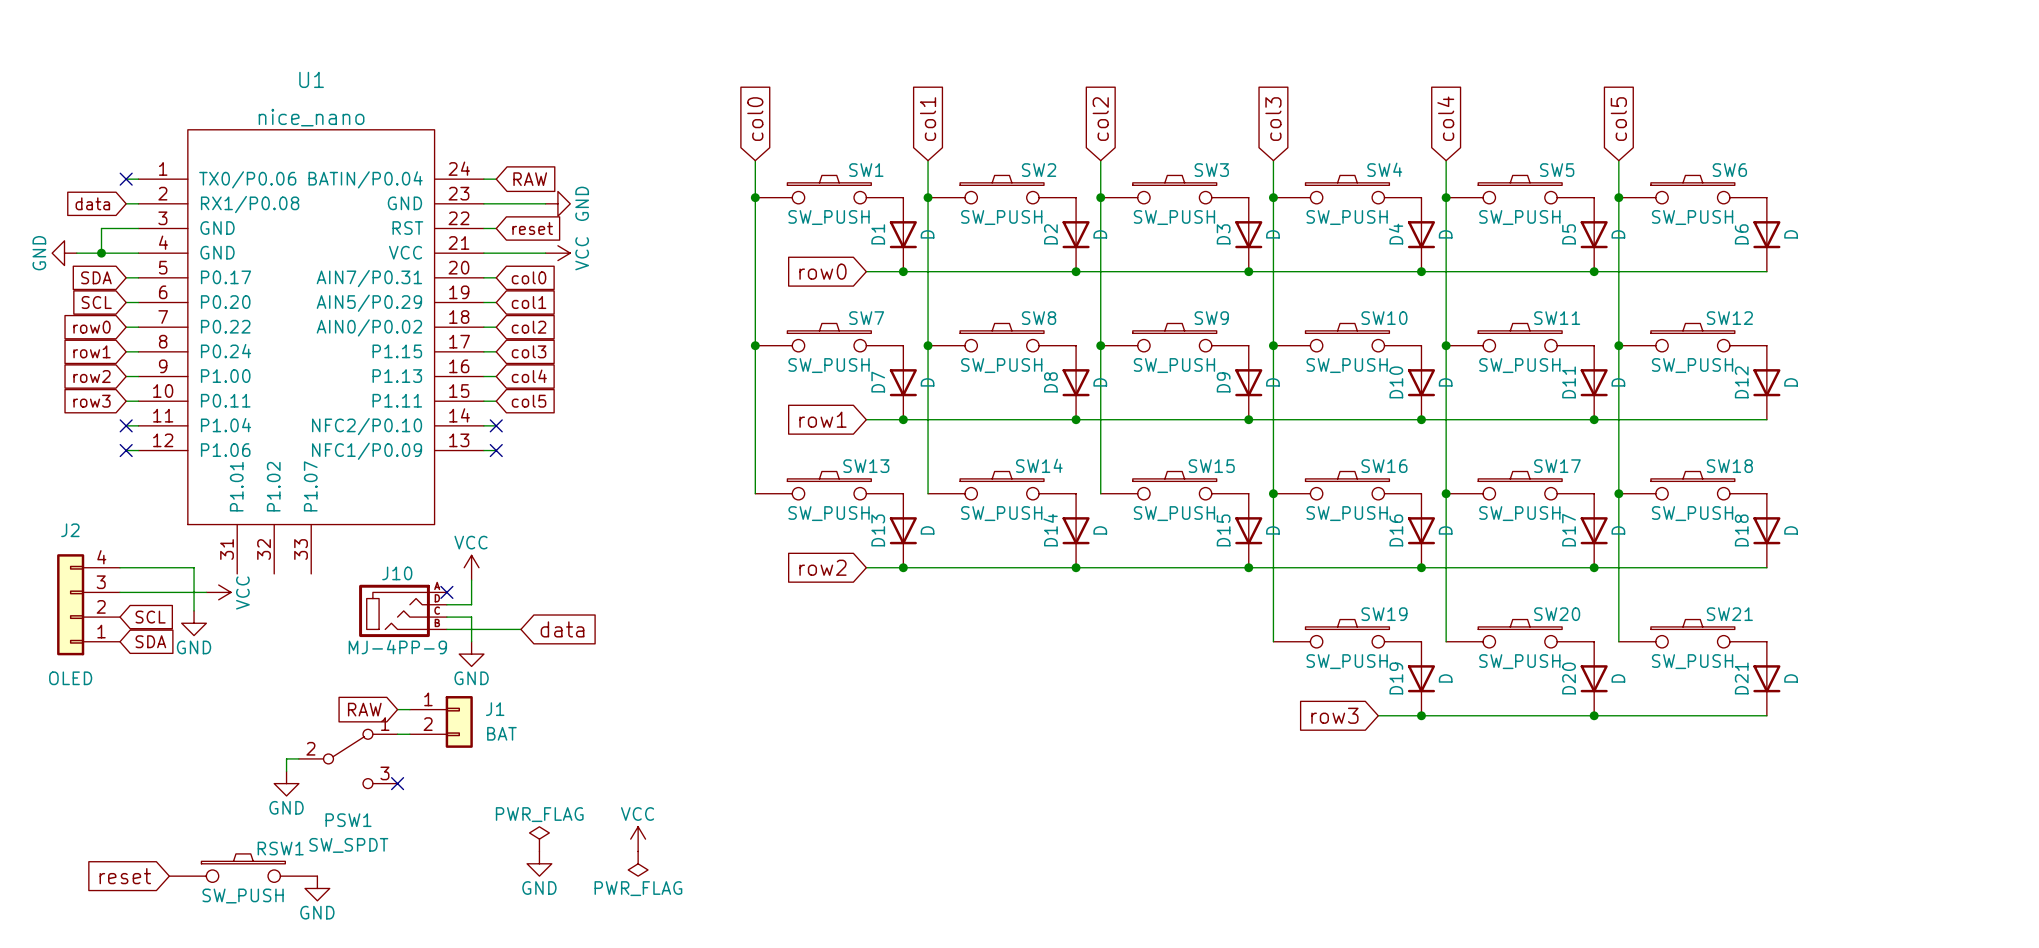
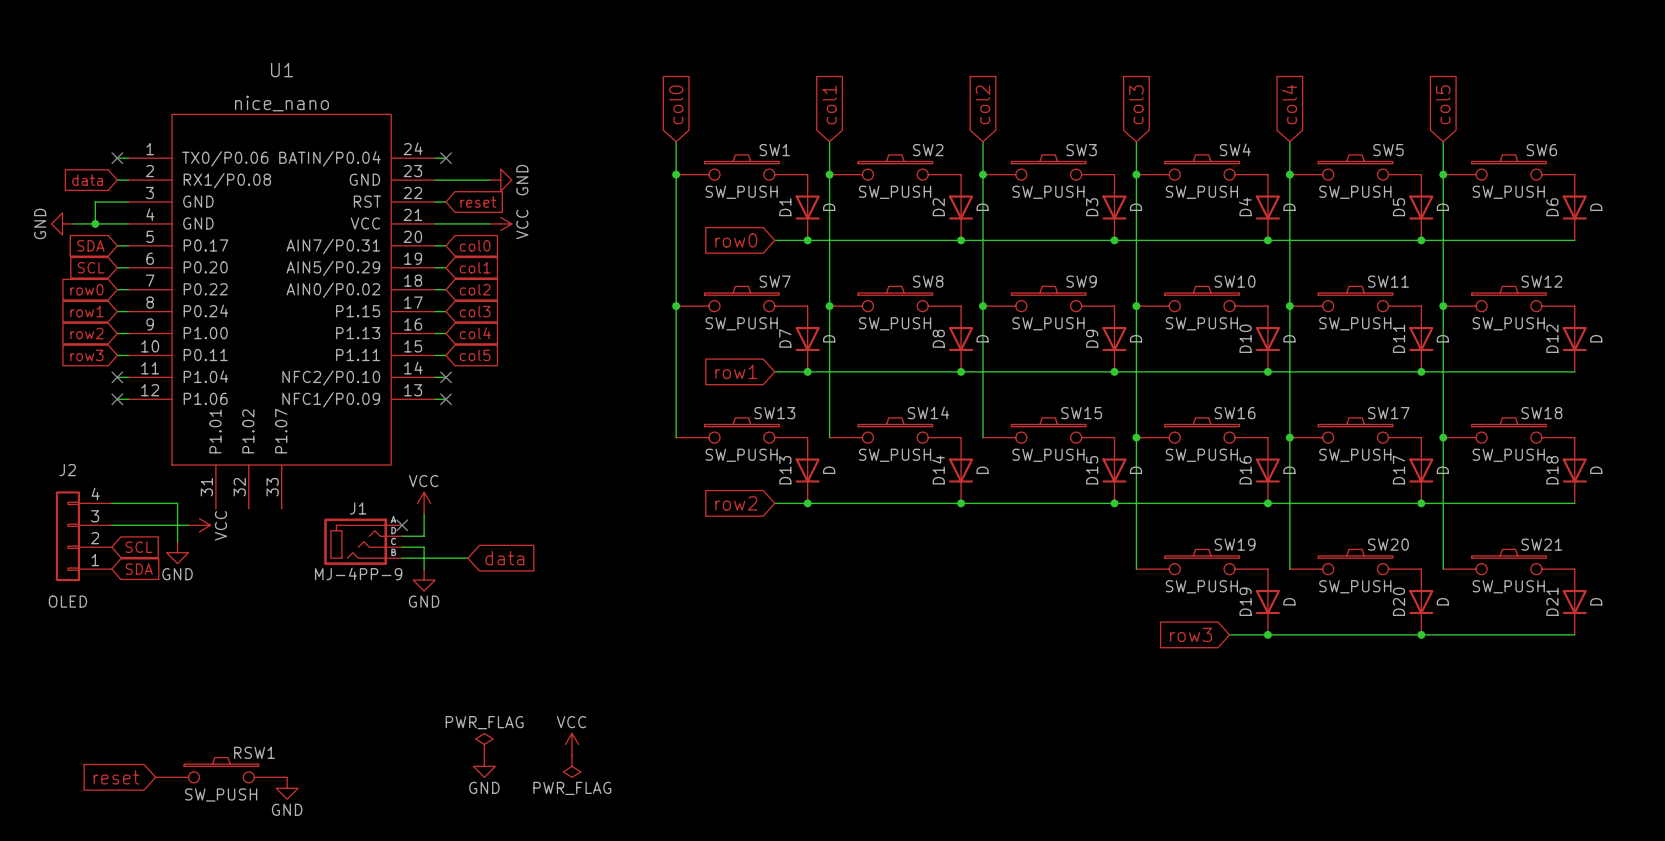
no-connect mark: none -> (446, 158)
global label: RAW (530, 179) -> none
J10 name: J10 (397, 573) -> J1 (358, 508)
global label: RAW (364, 709) -> none
wire: (397, 709) (409, 709) -> none
J1: BAT (441, 721) -> none
wire: (397, 734) (409, 734) -> none
wire: (298, 758) (286, 758) (286, 771) -> none
PSW1: SW_SPDT (348, 758) -> none
power symbol: GND (286, 783) -> none
no-connect mark: (397, 783) -> none

